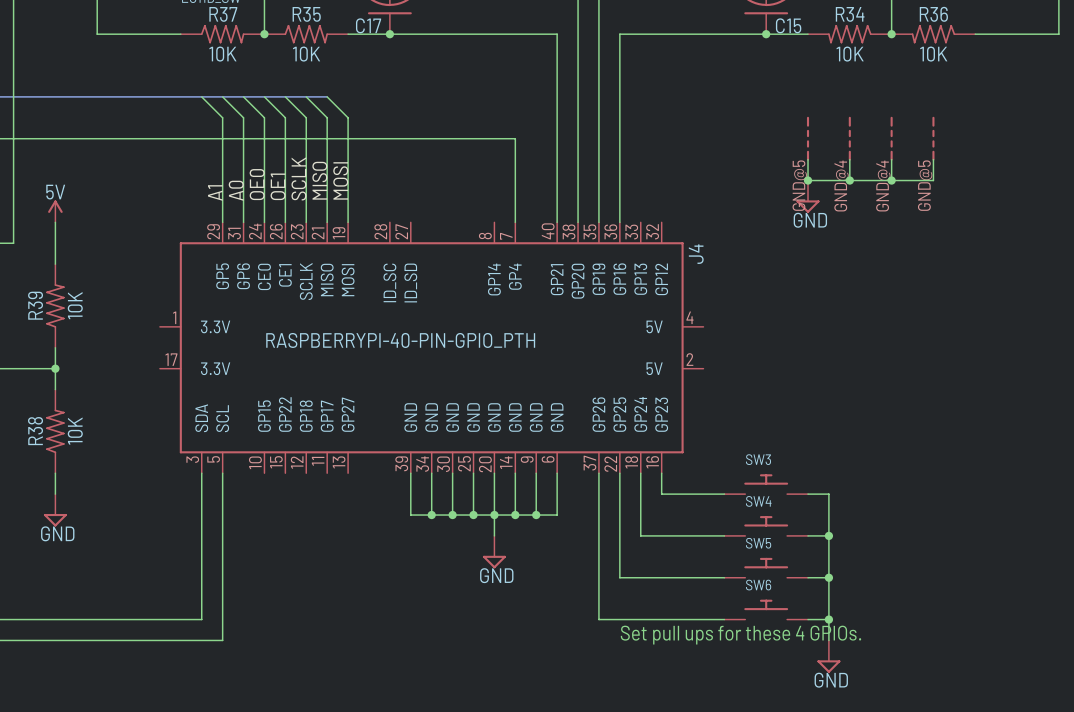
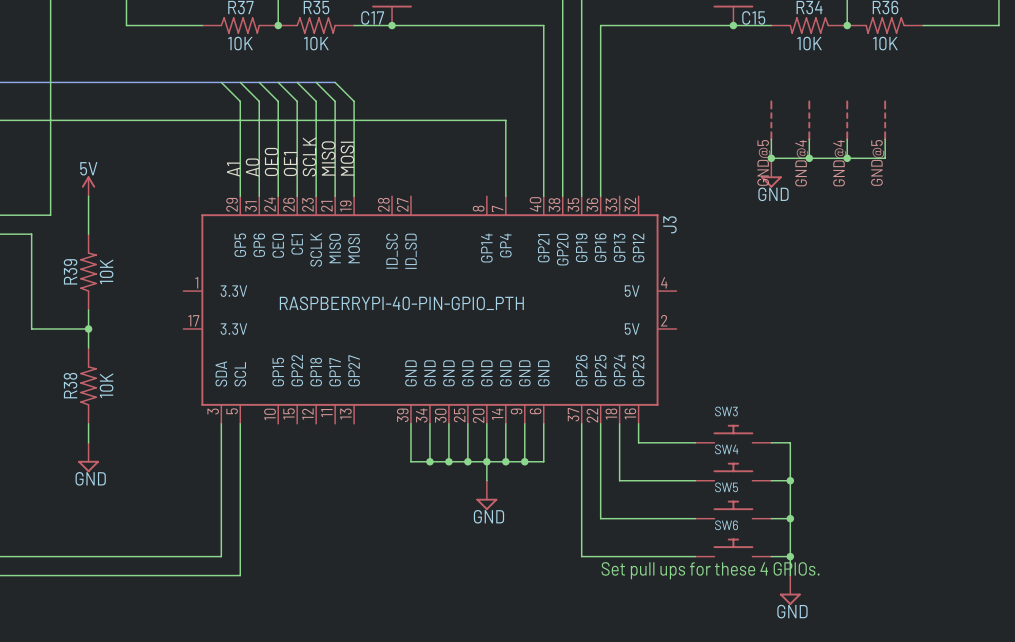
J4 name: J4 (696, 254) -> J3 (669, 224)

